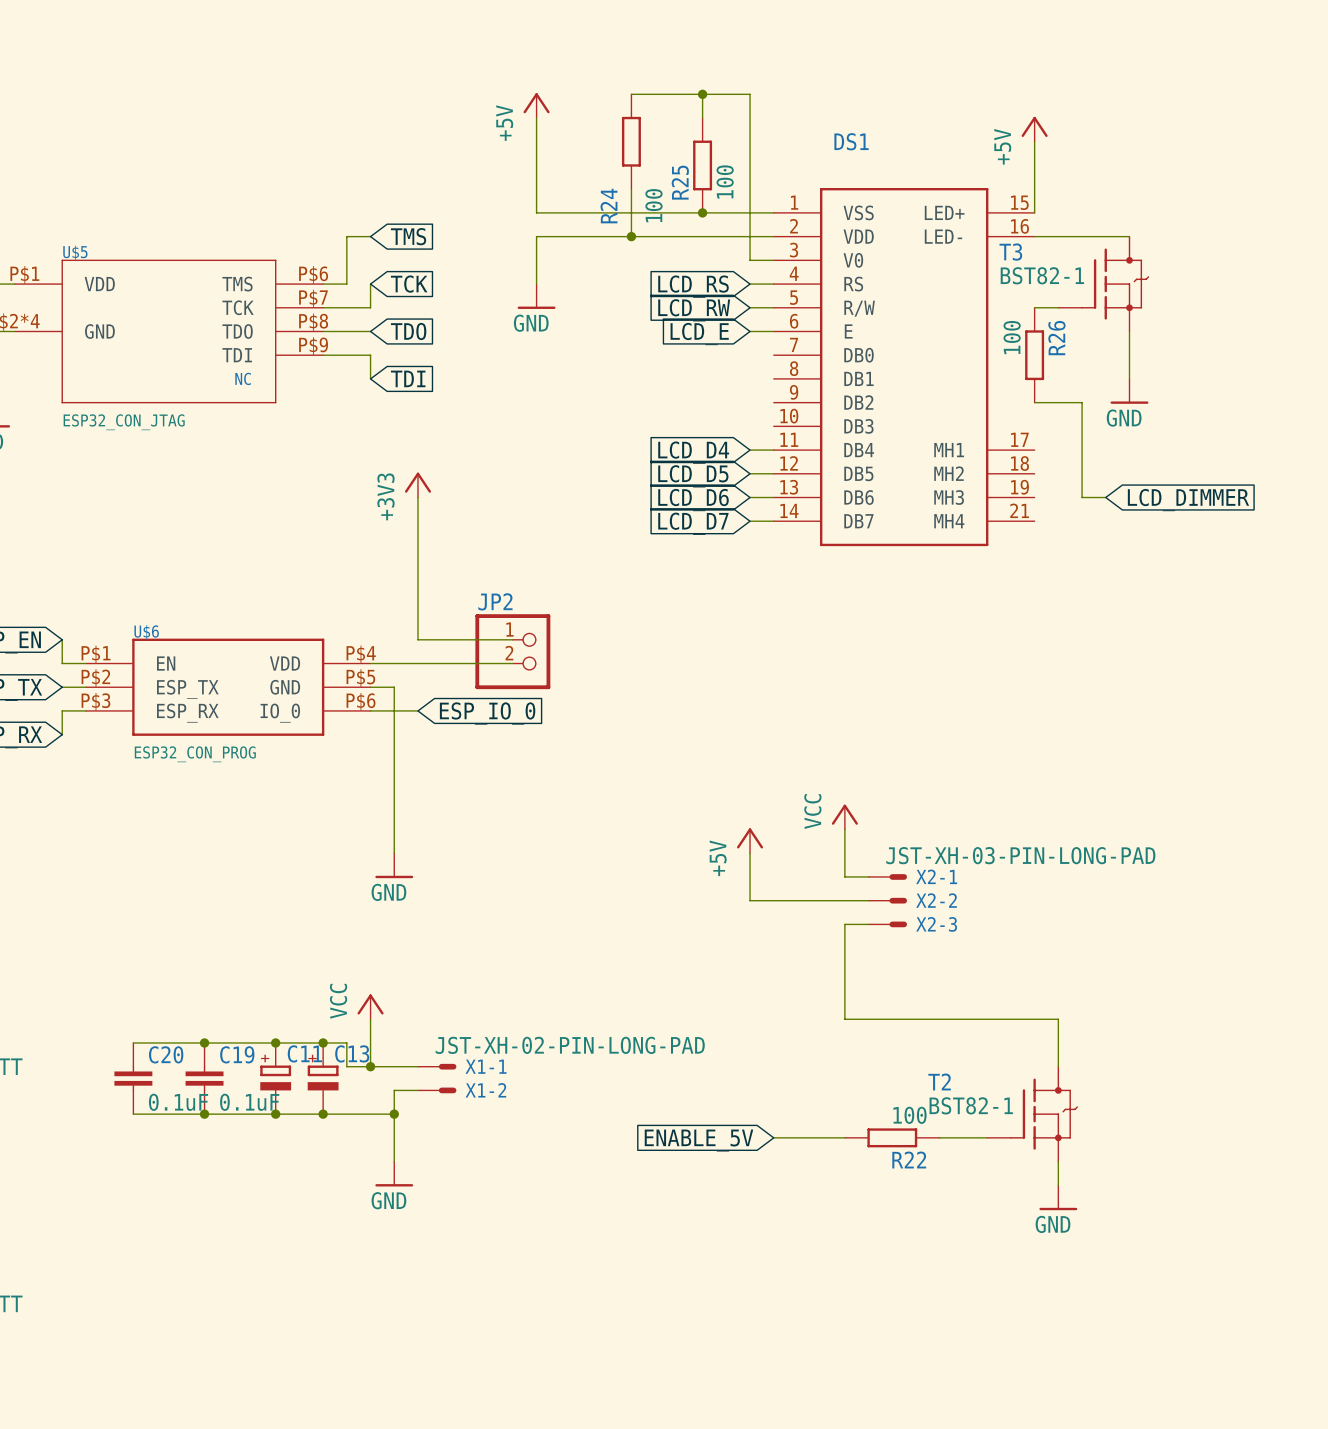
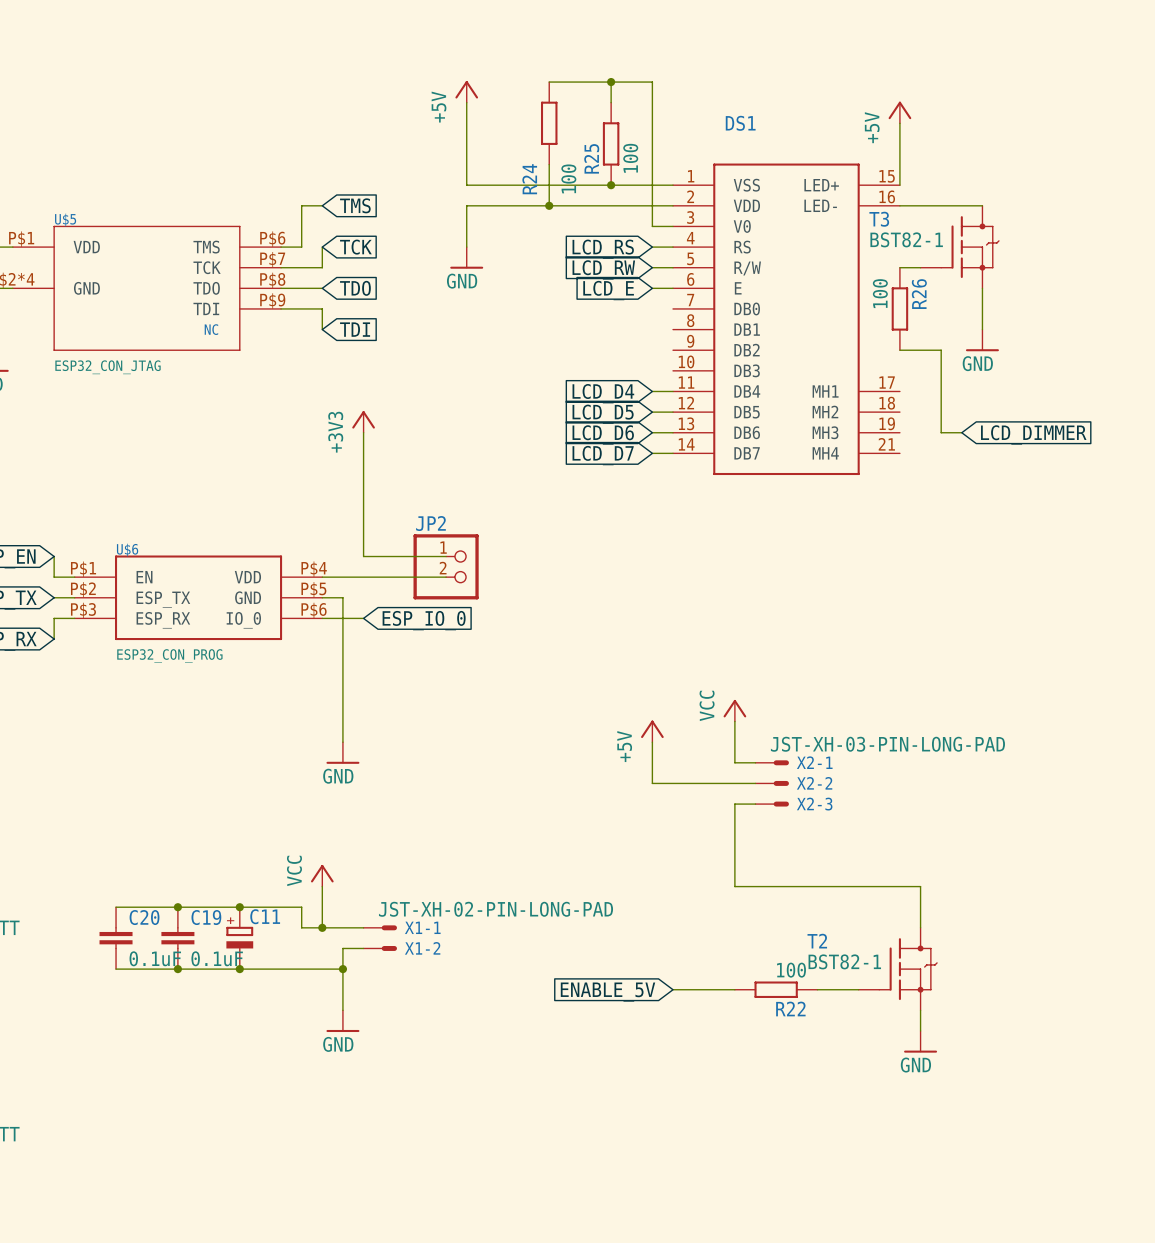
junction: (323, 1042) -> none
C13: (323, 1078) -> none
junction: (323, 1114) -> none

